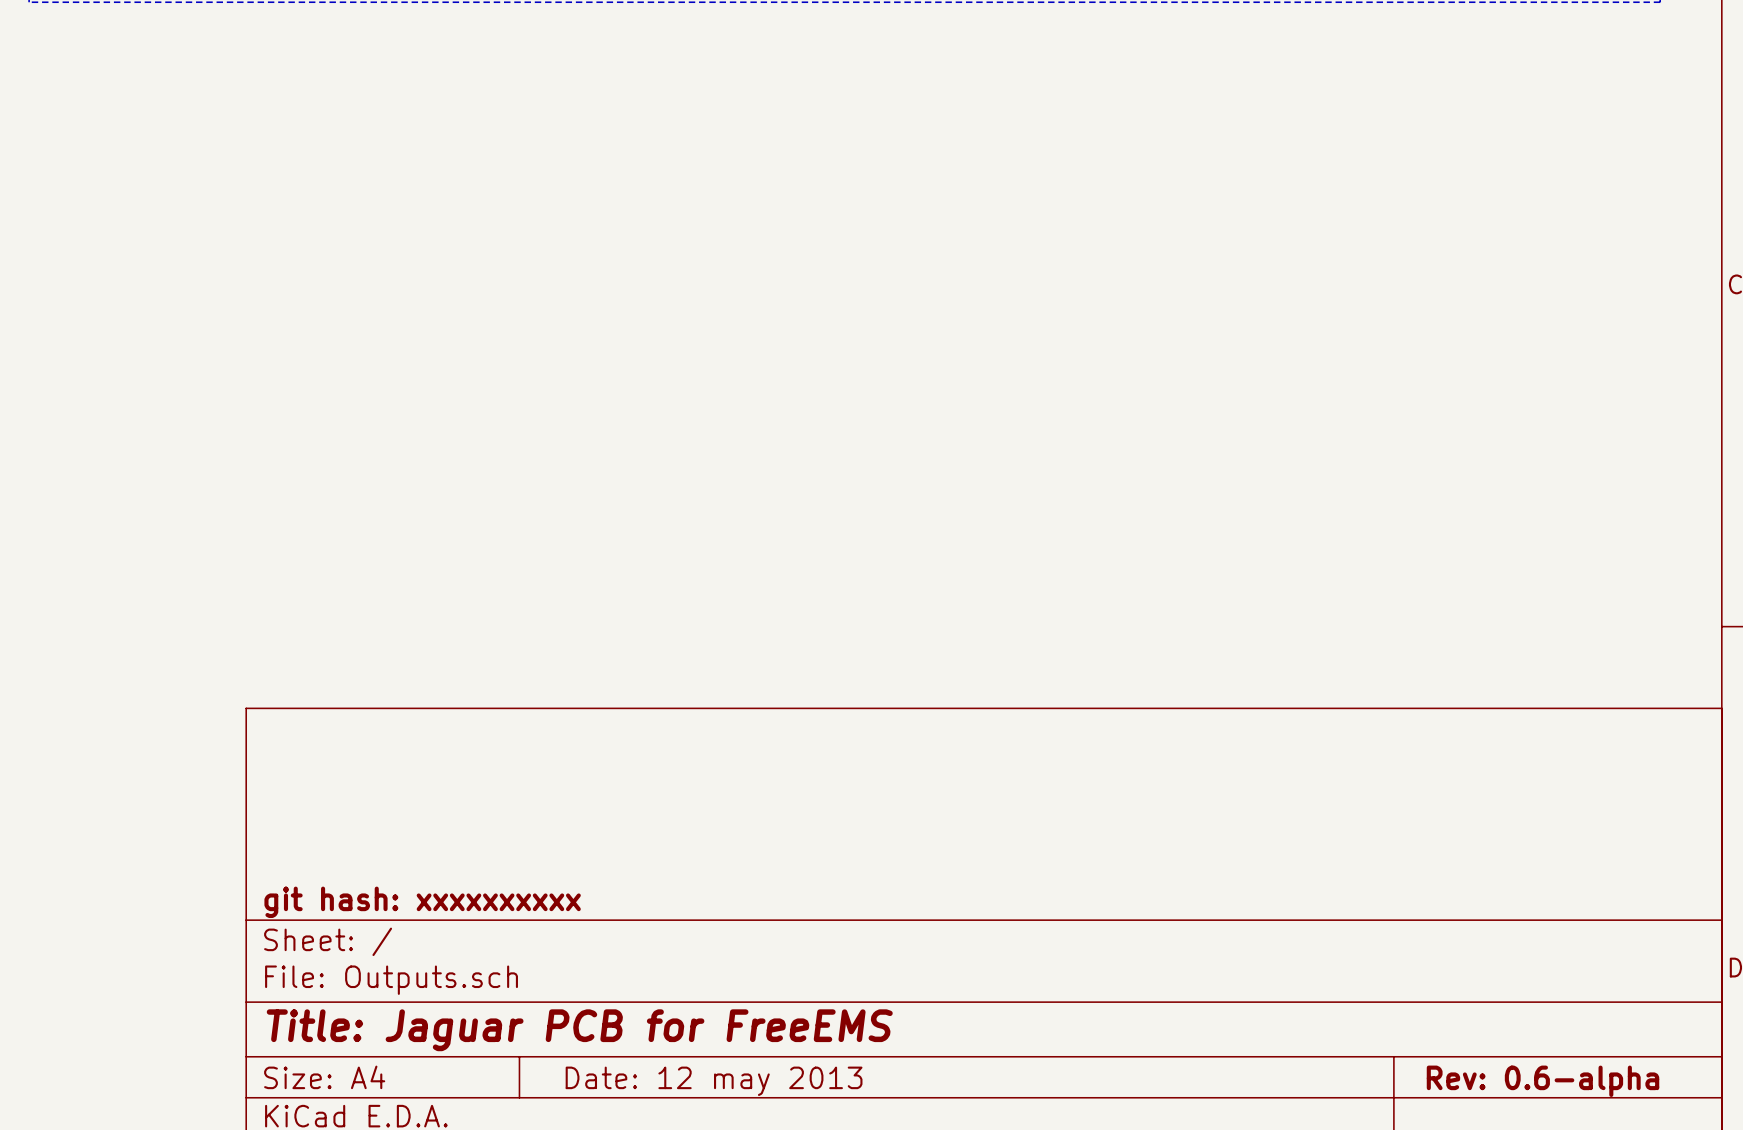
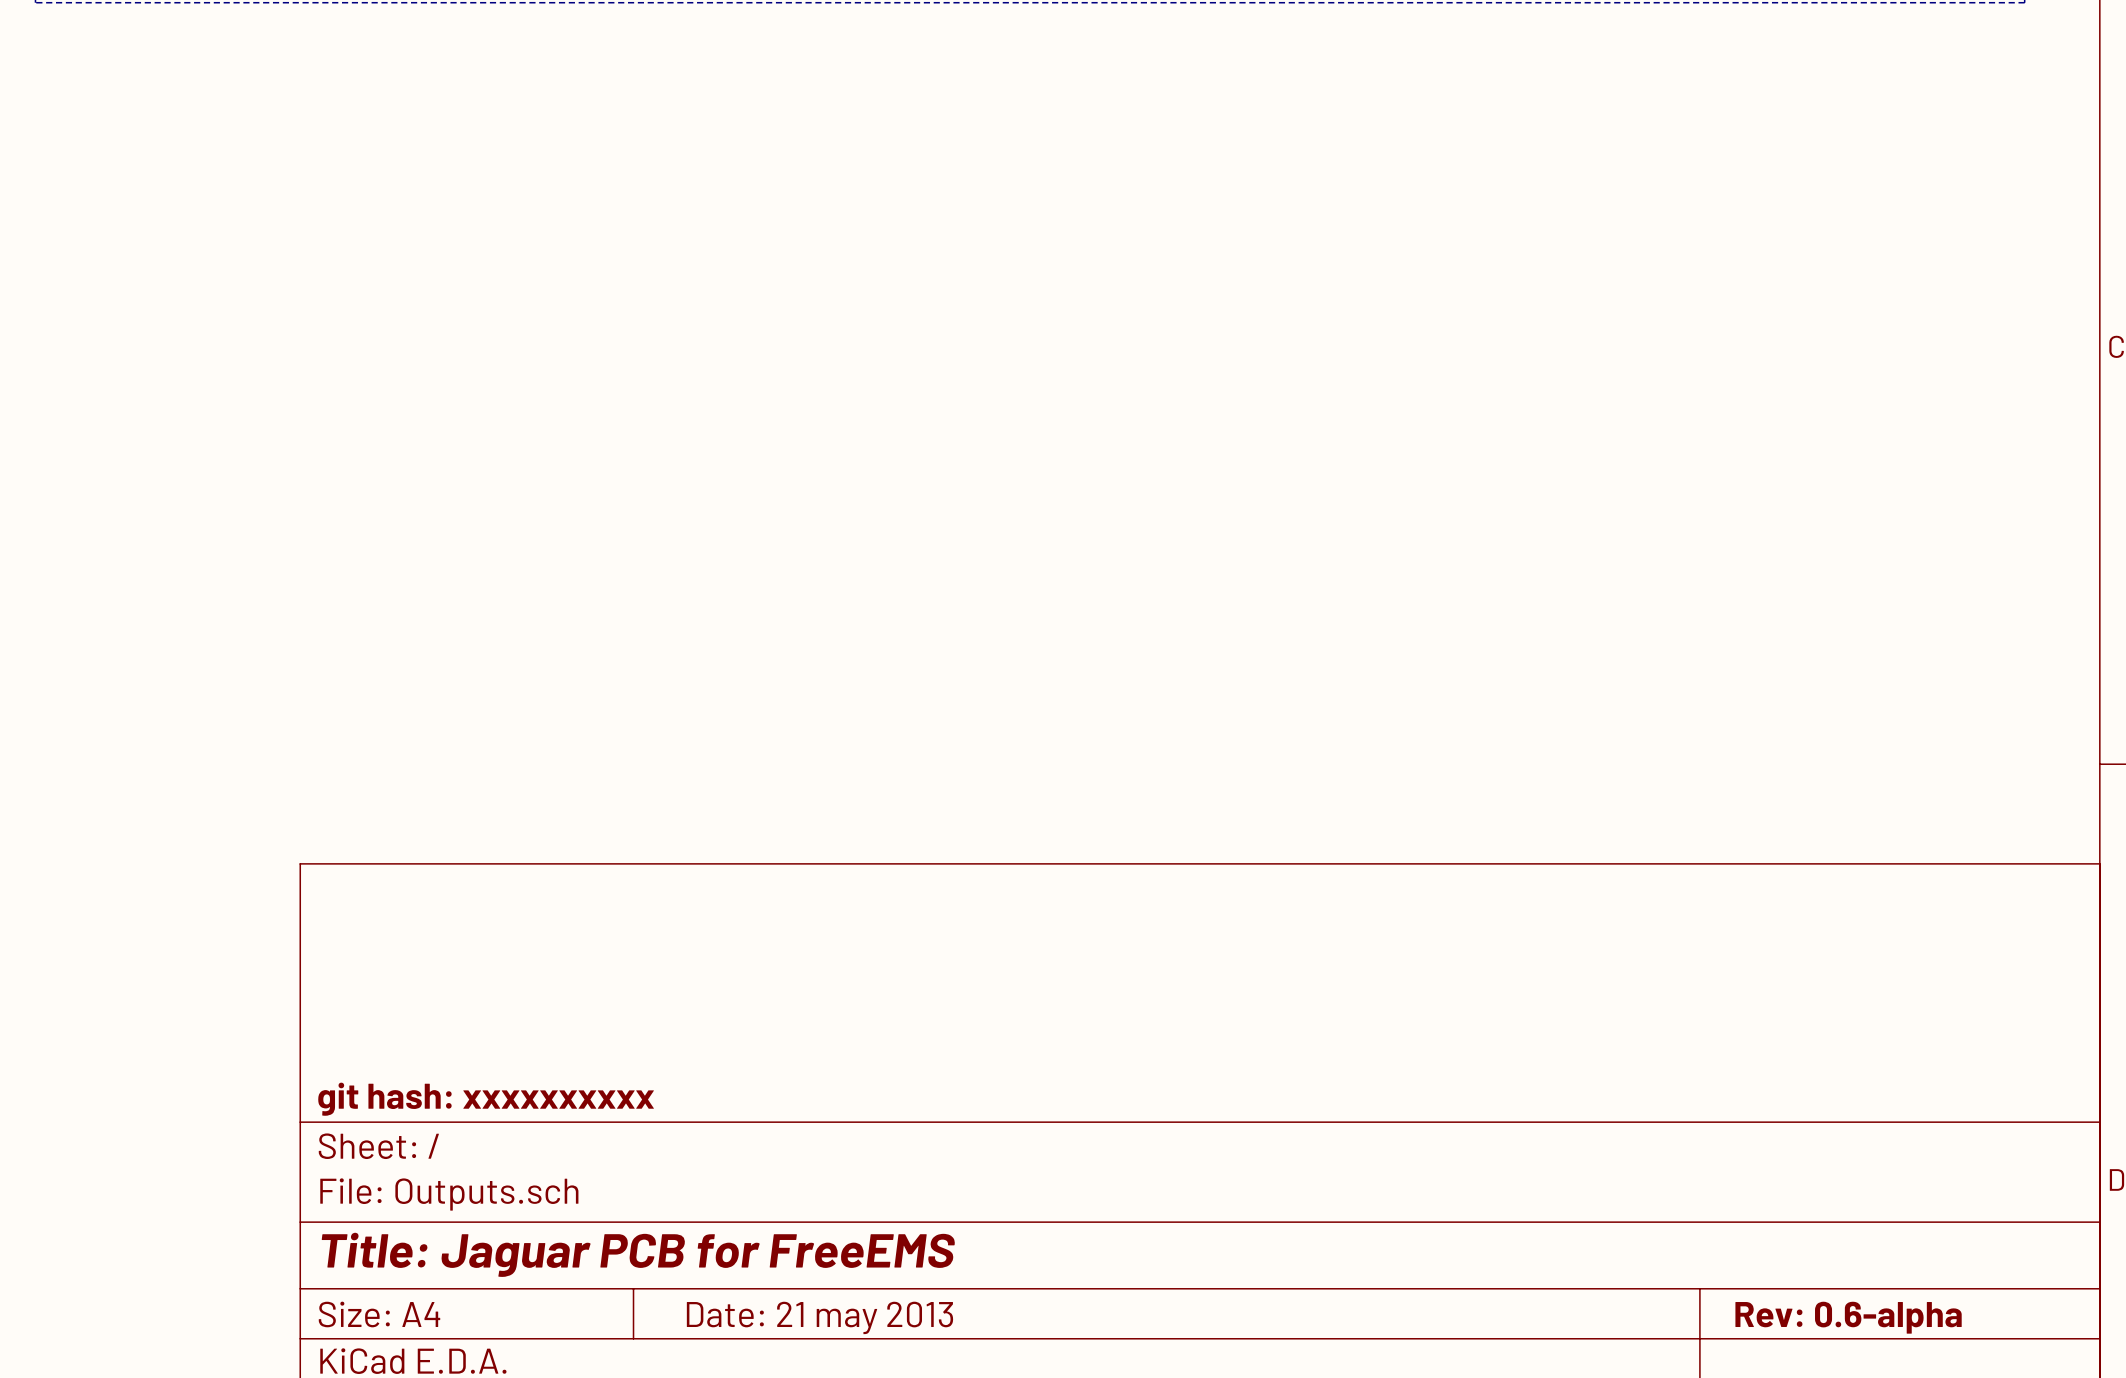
title block: Date: 12 may 2013 (714, 1081) -> Date: 21 may 2013 (819, 1317)

